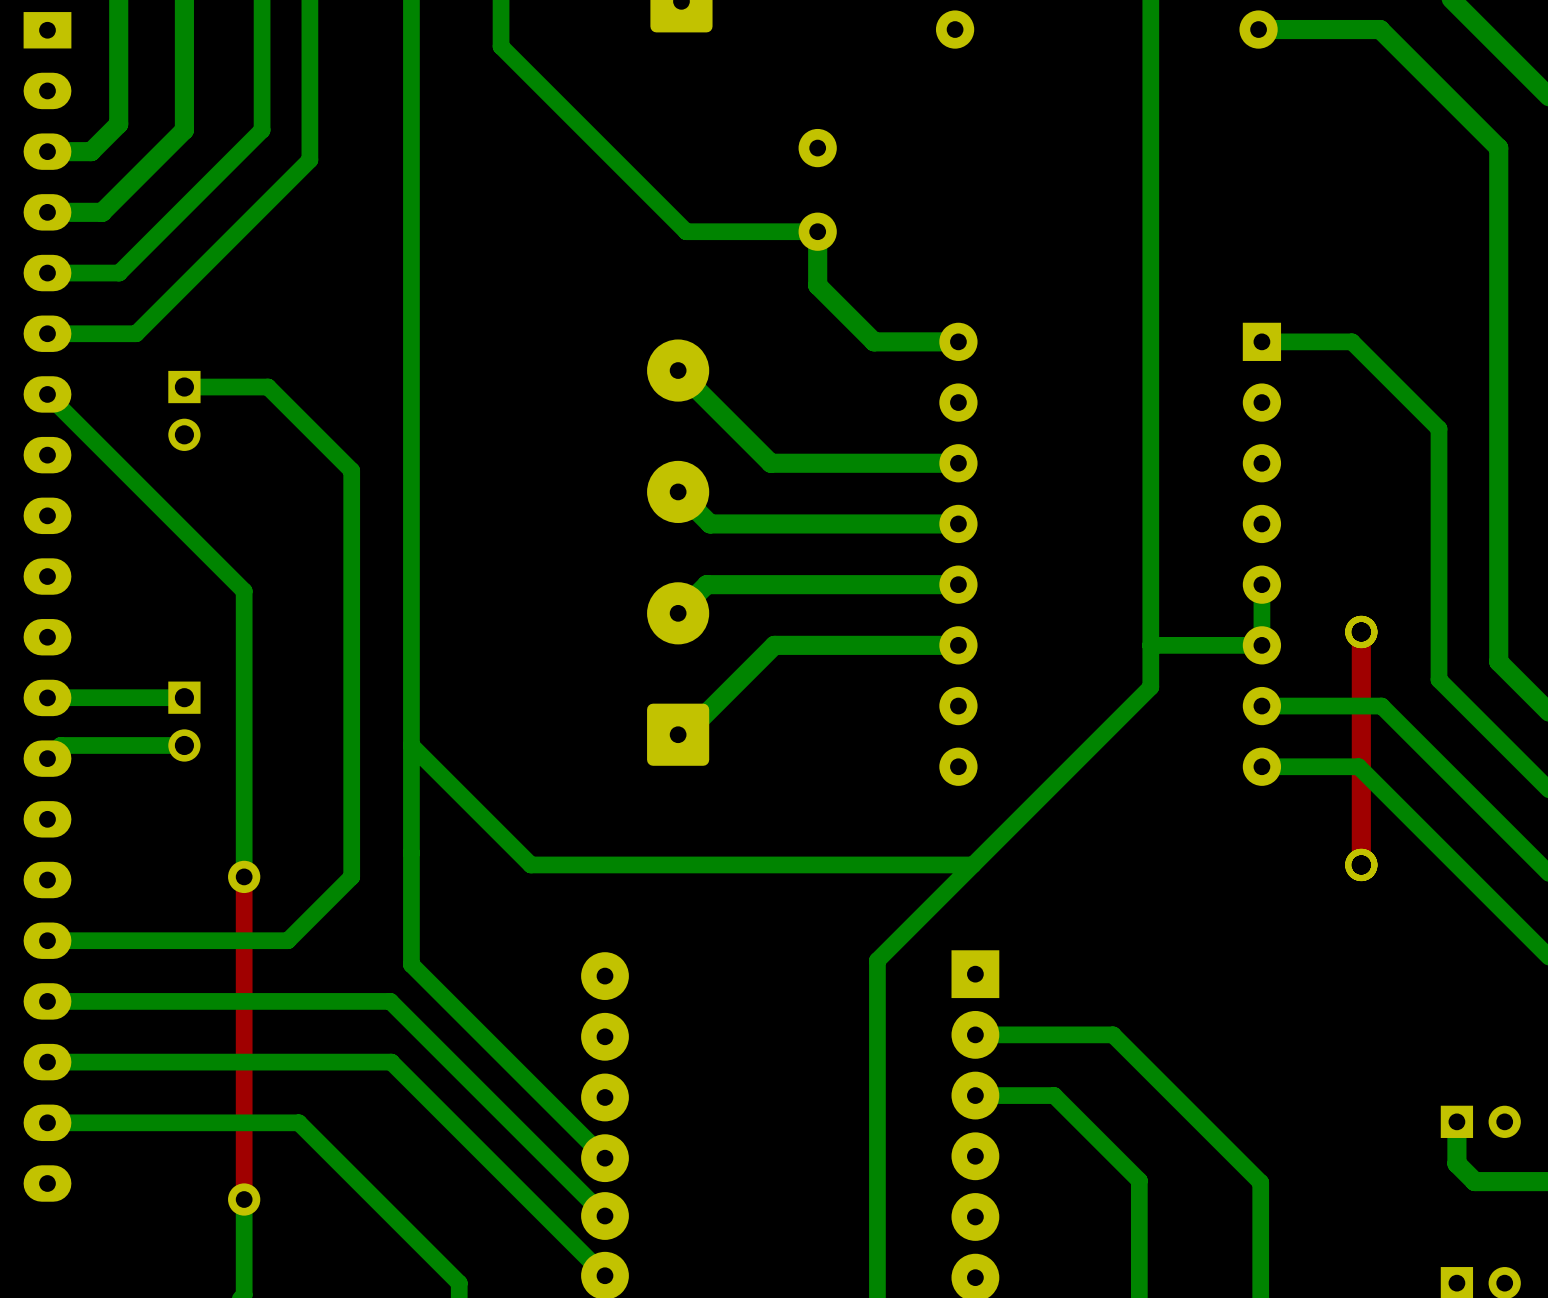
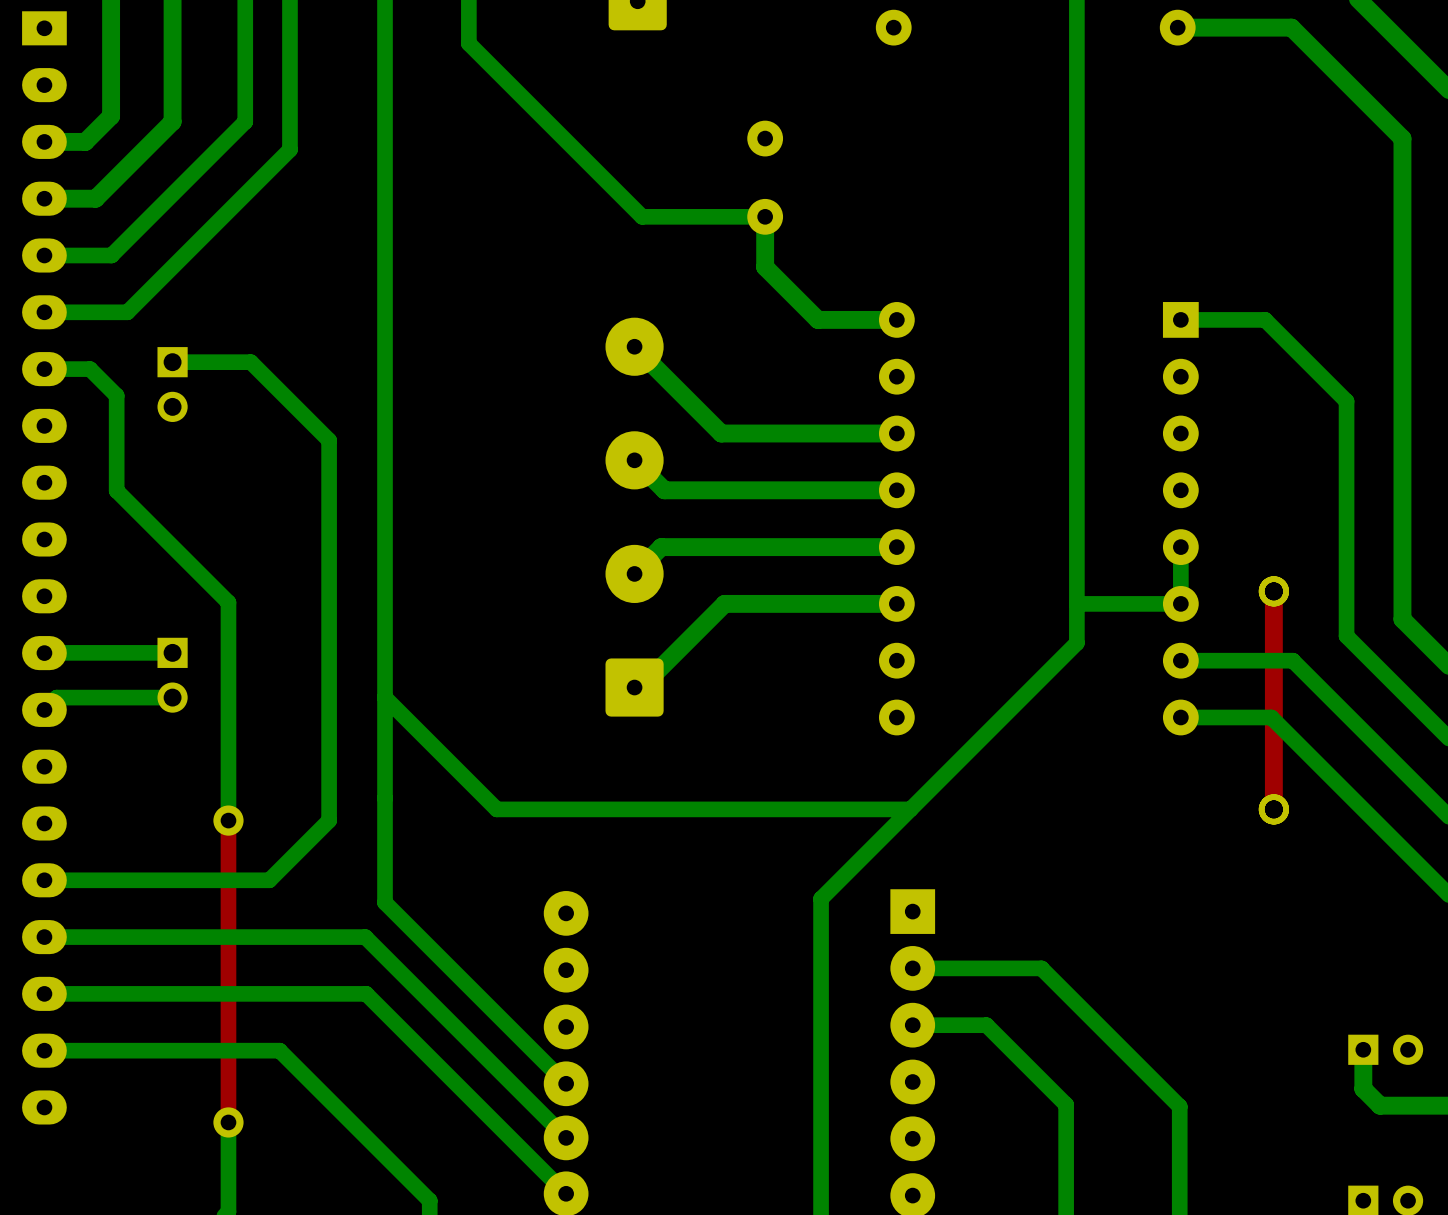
bottom track: (47, 394) (244, 591) (244, 643) -> (44, 369) (90, 369) (116, 395) (116, 490) (228, 602)

